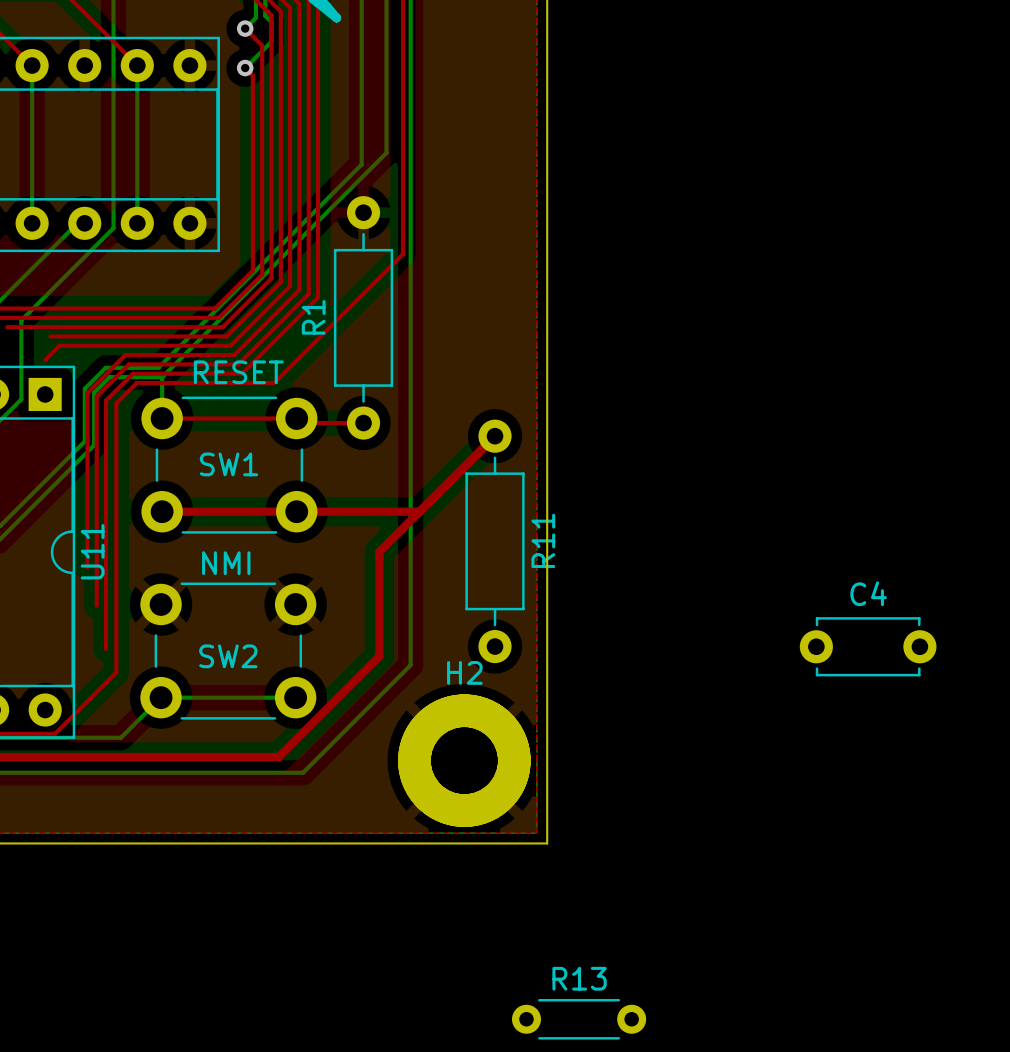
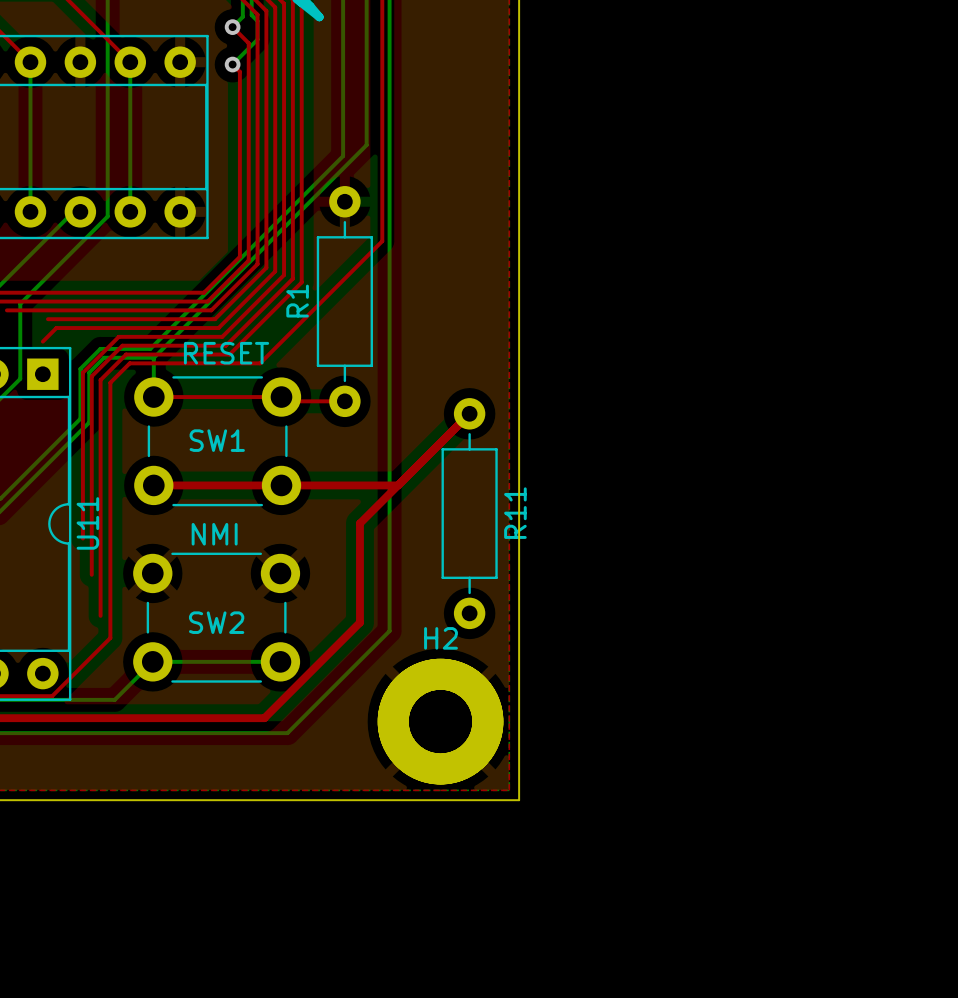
C4: (868, 646) -> none
R13: (579, 1019) -> none

